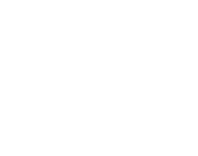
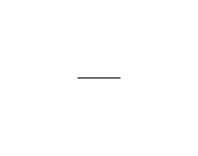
wire: none -> (77, 77) (120, 77)

